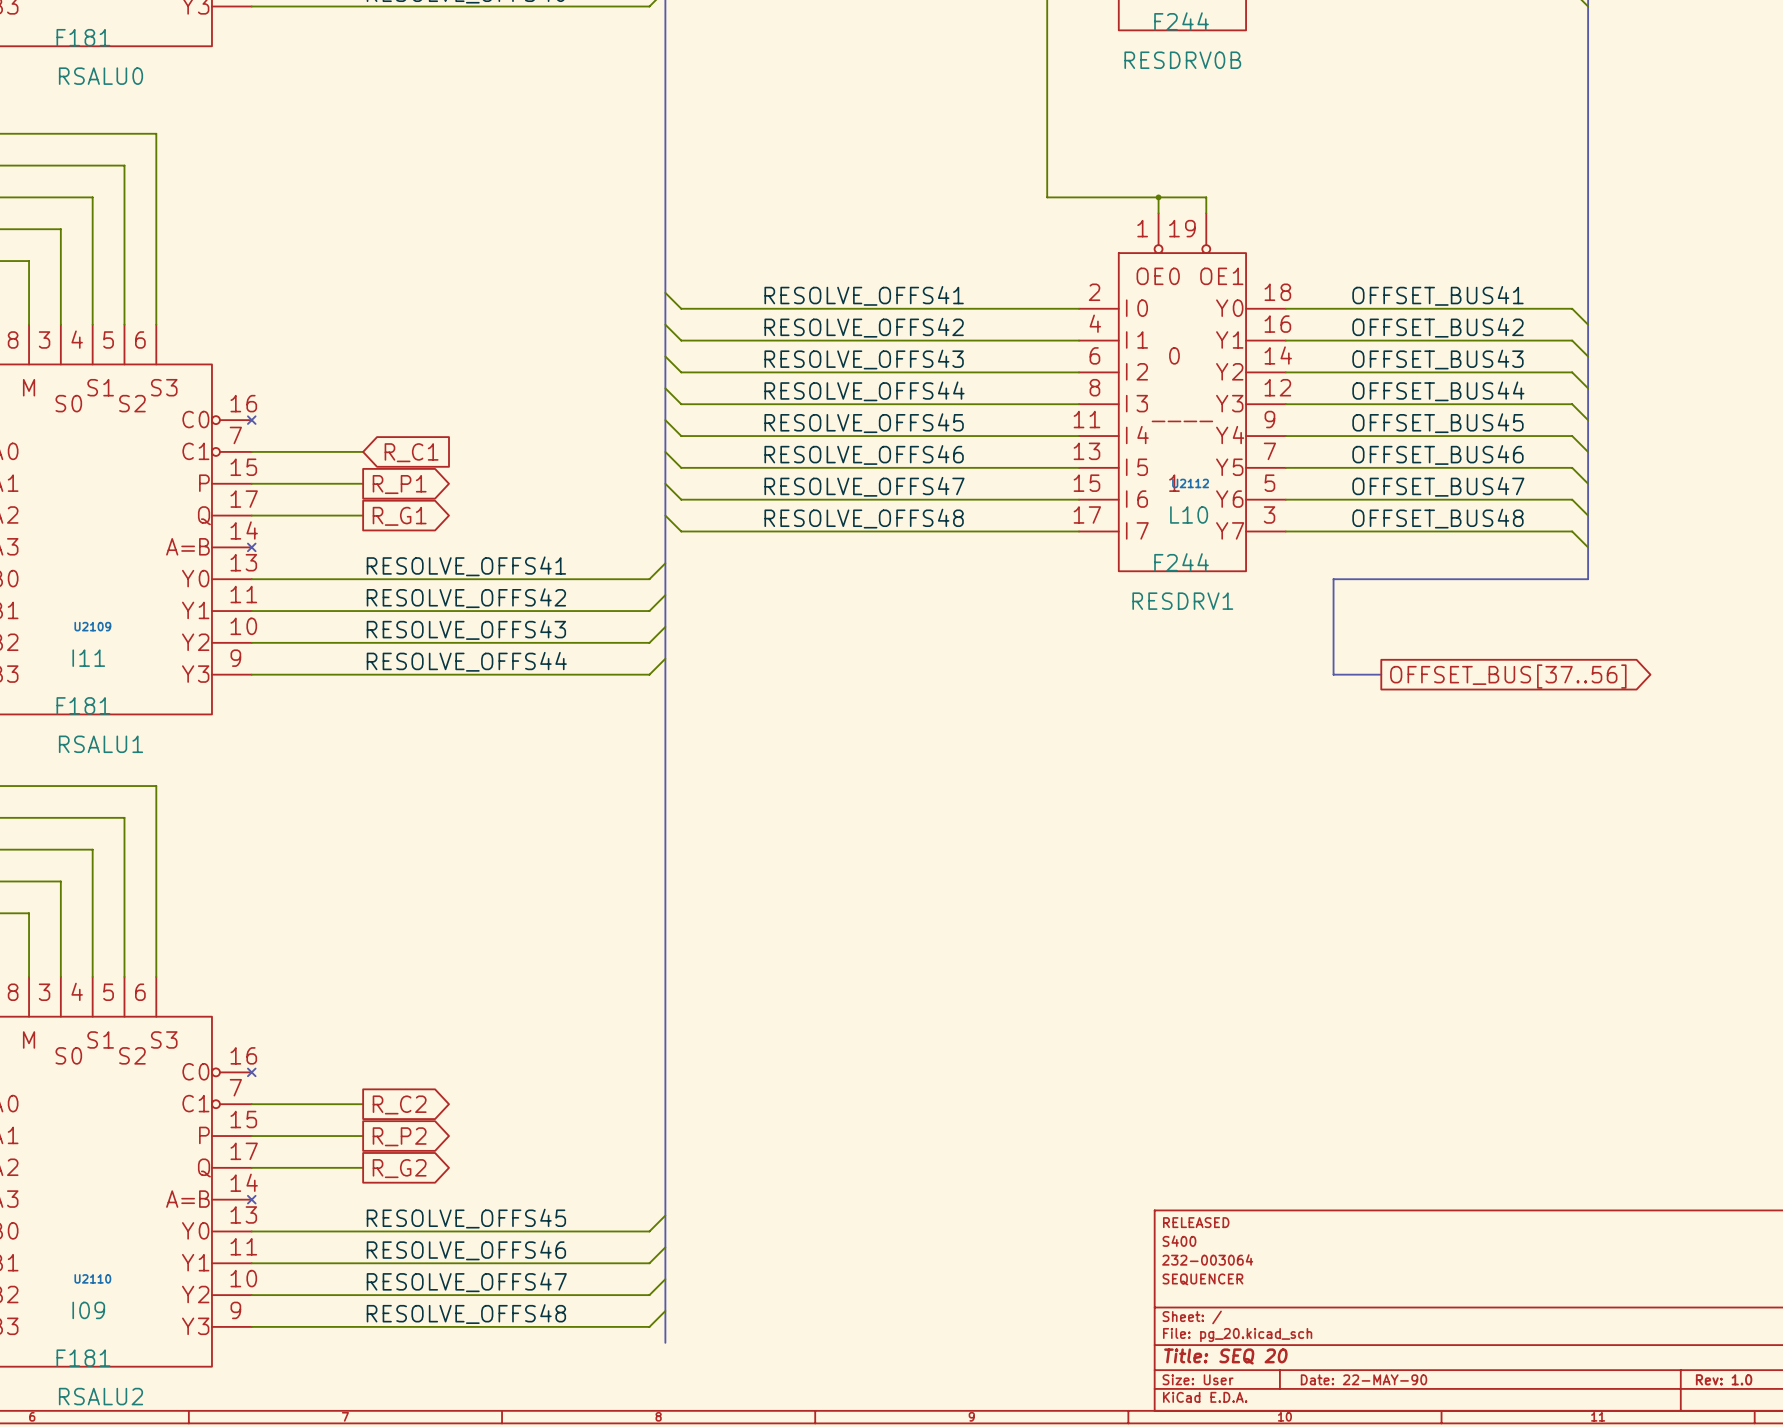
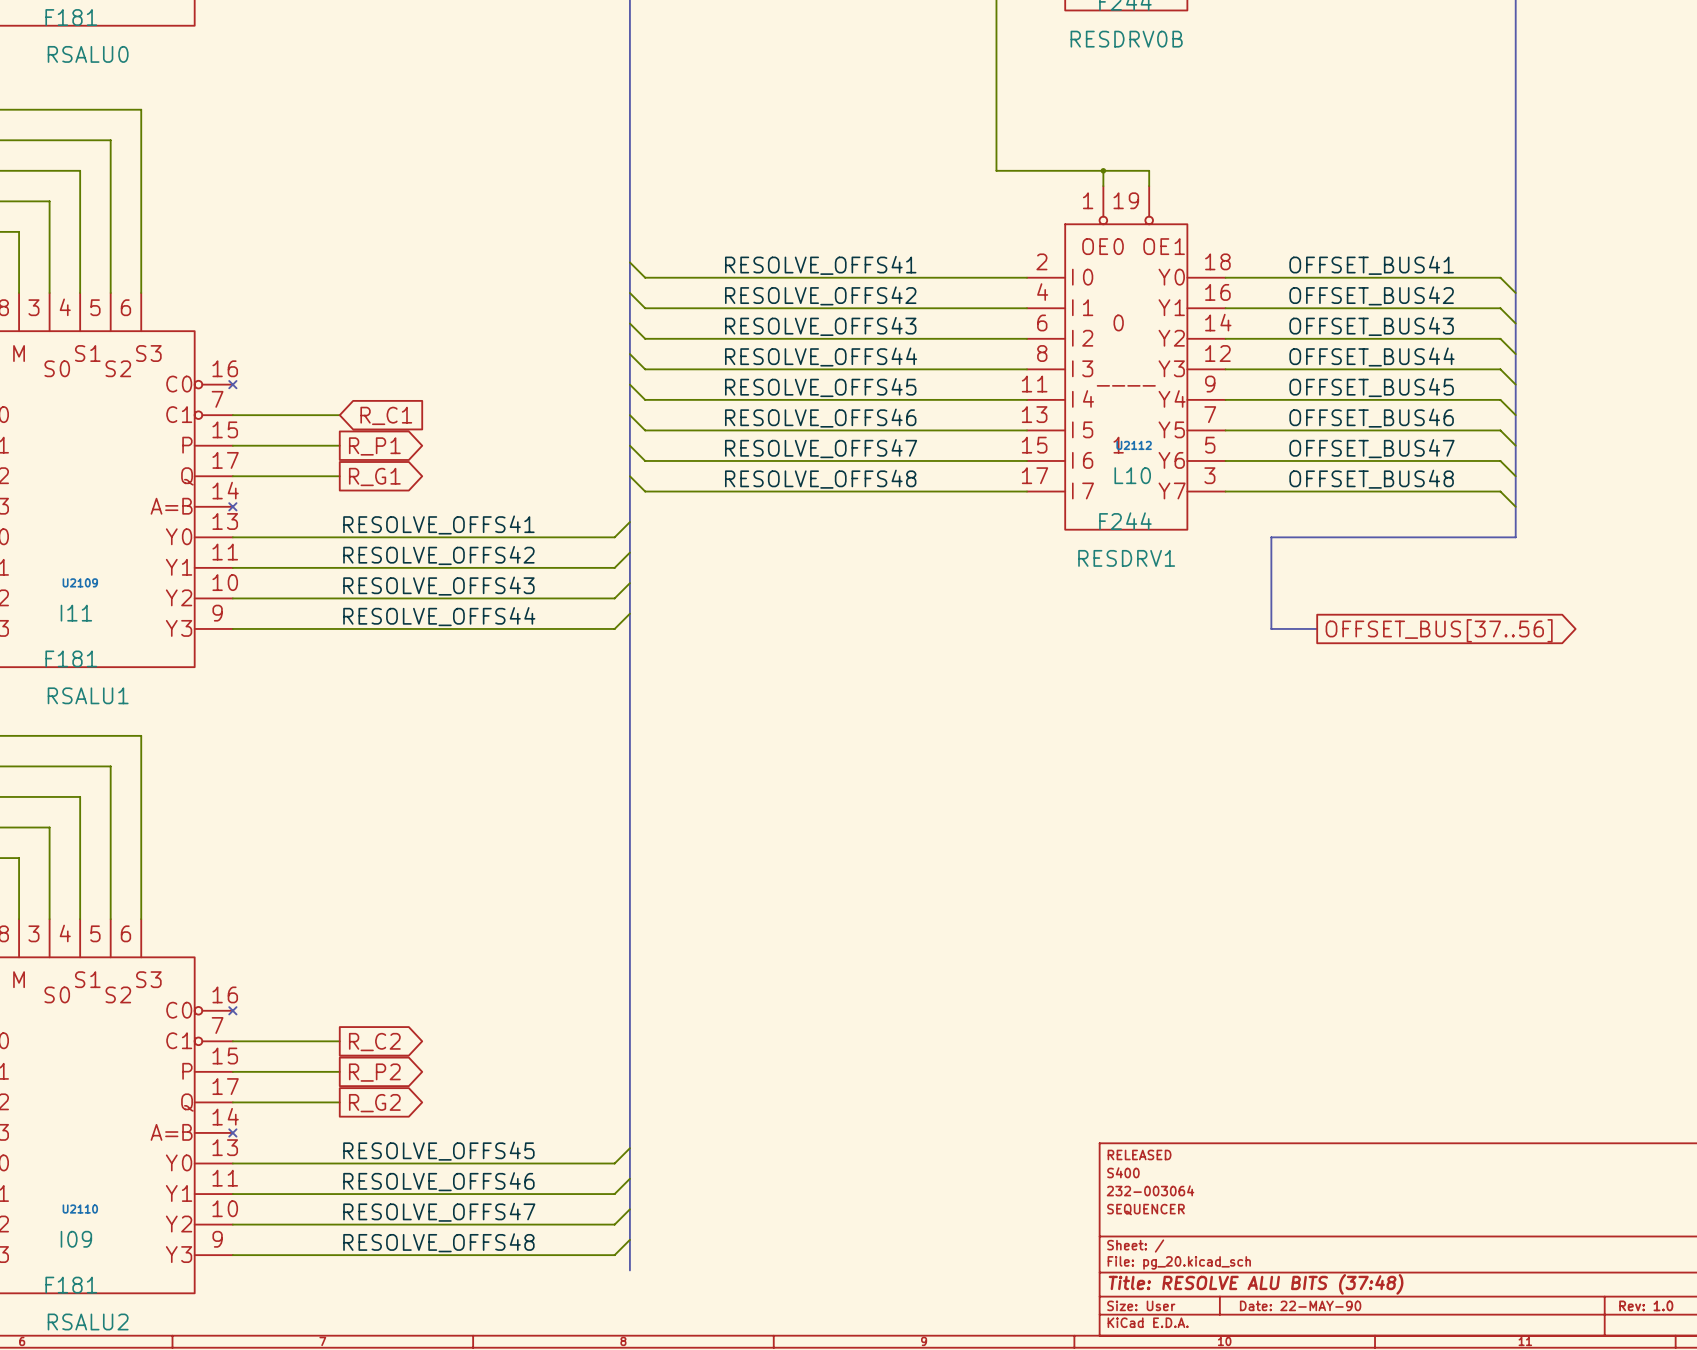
title block: Title: SEQ 20 (1225, 1356) -> Title: RESOLVE ALU BITS (37:48) (1256, 1284)

